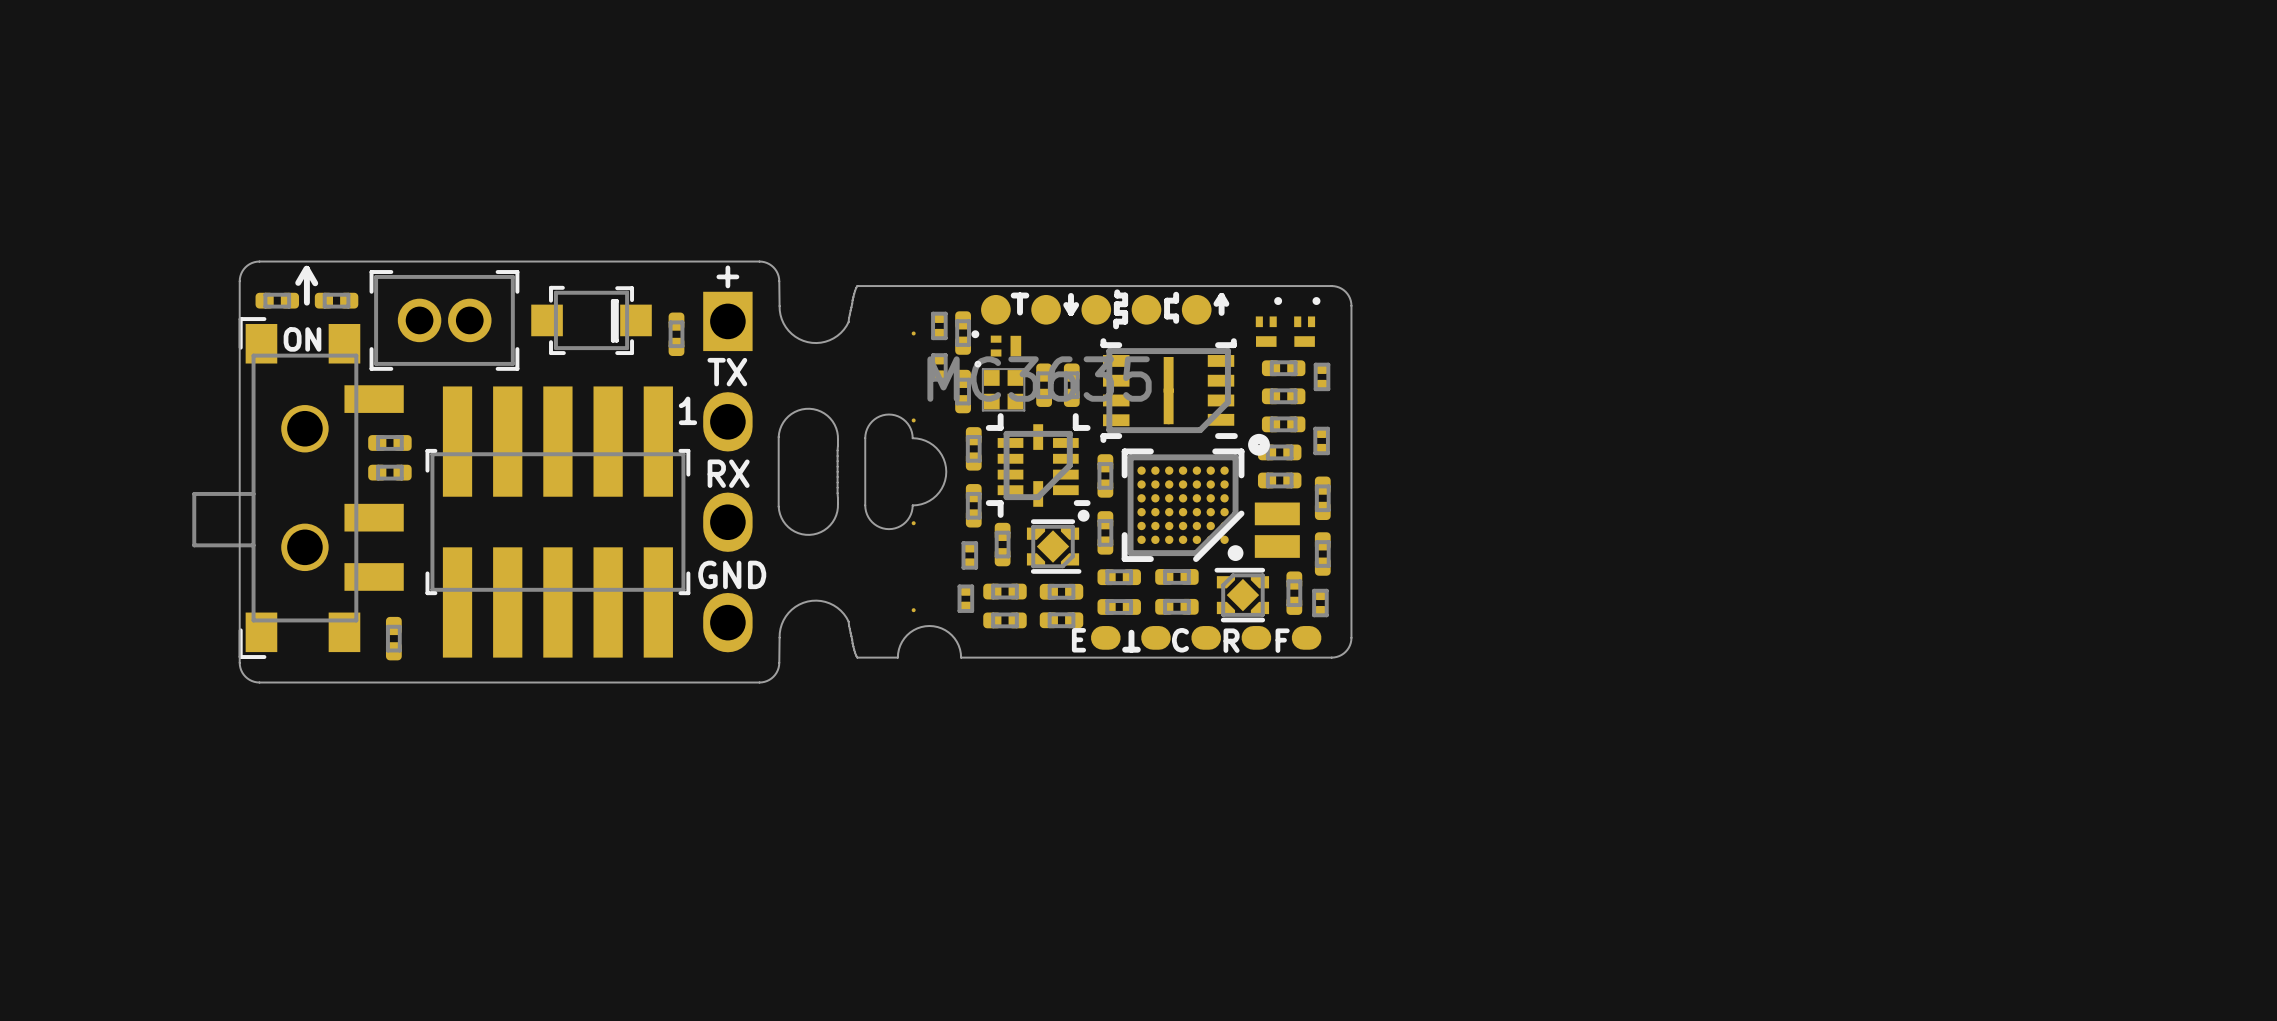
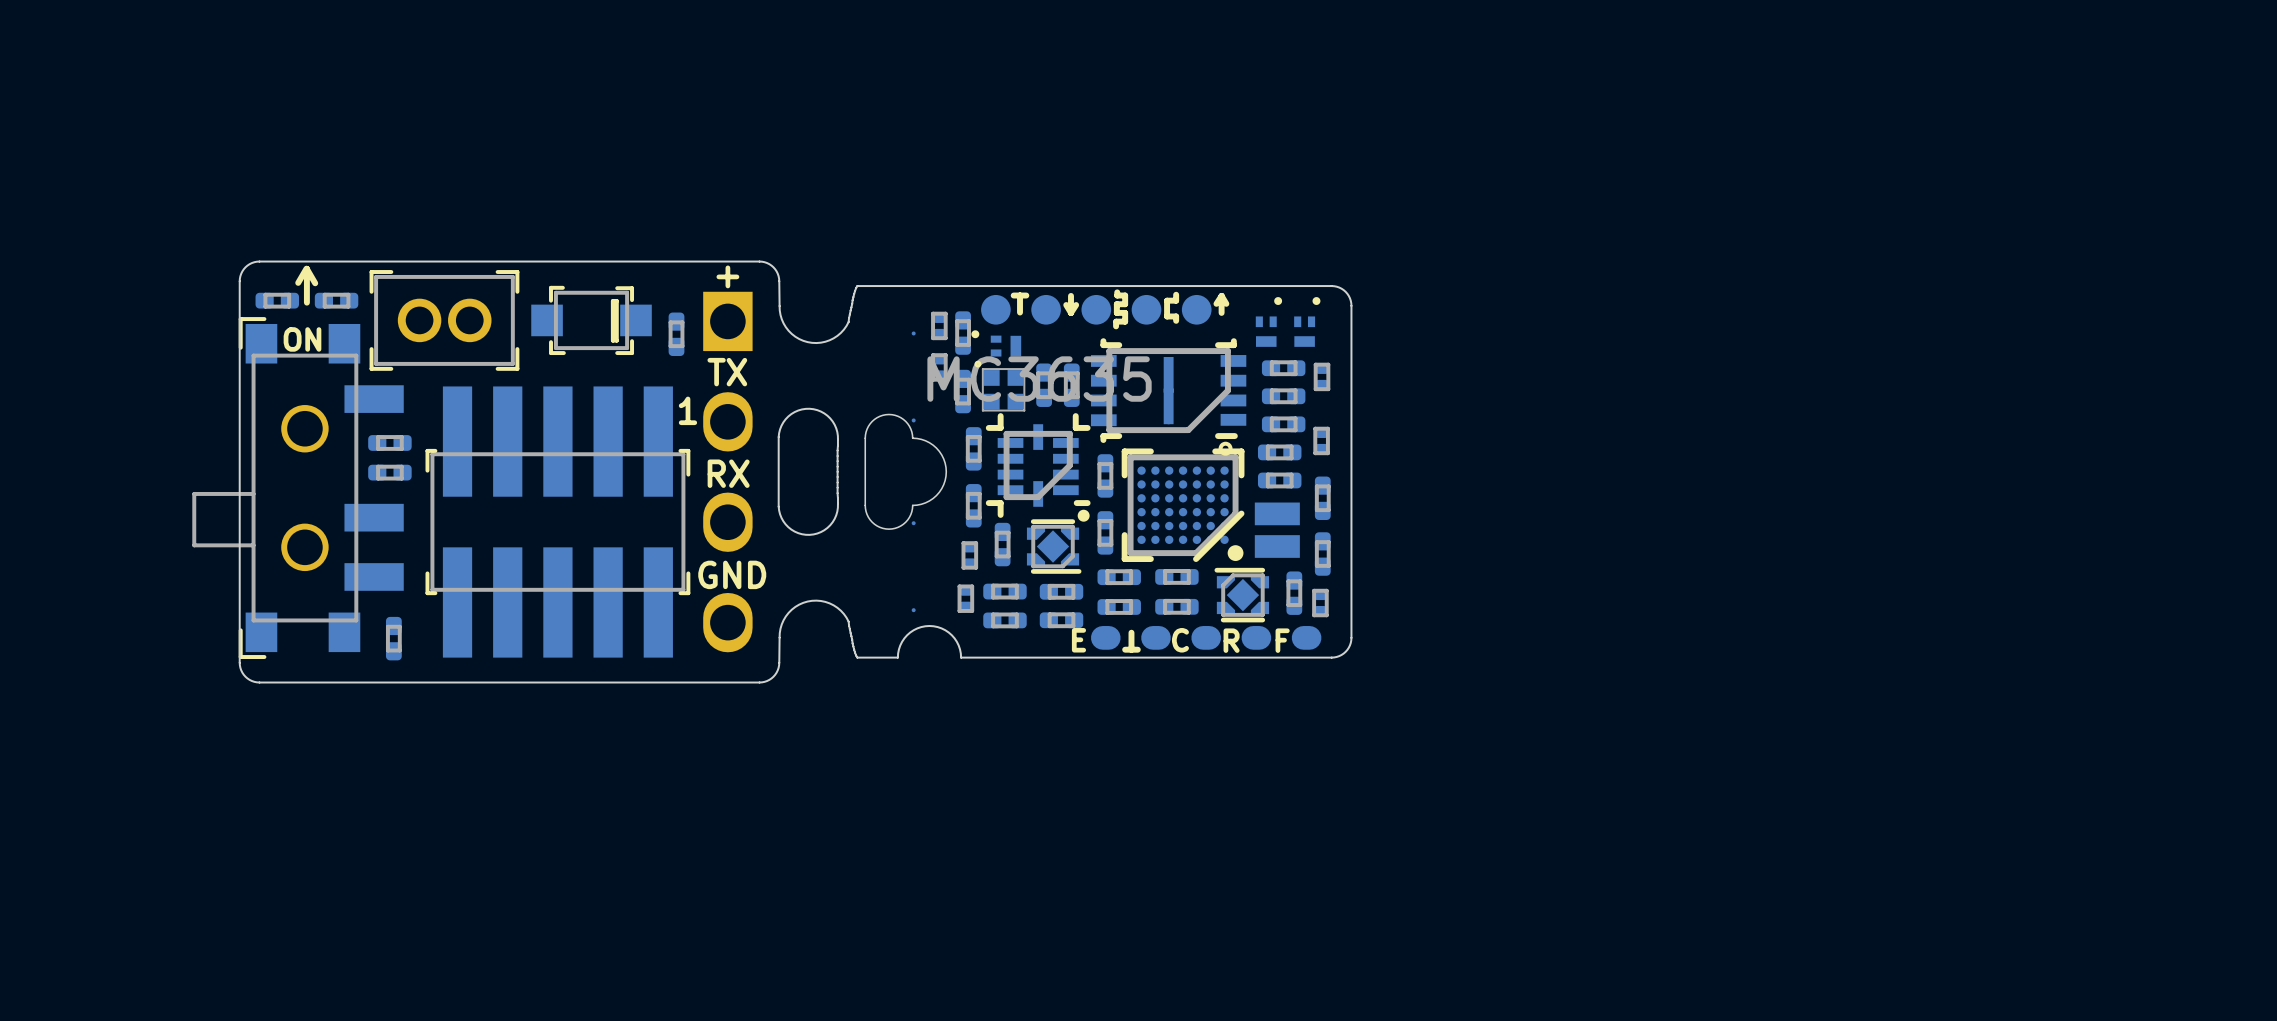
part footprint: [1100, 338, 1270, 456] -> [1090, 338, 1247, 456]

